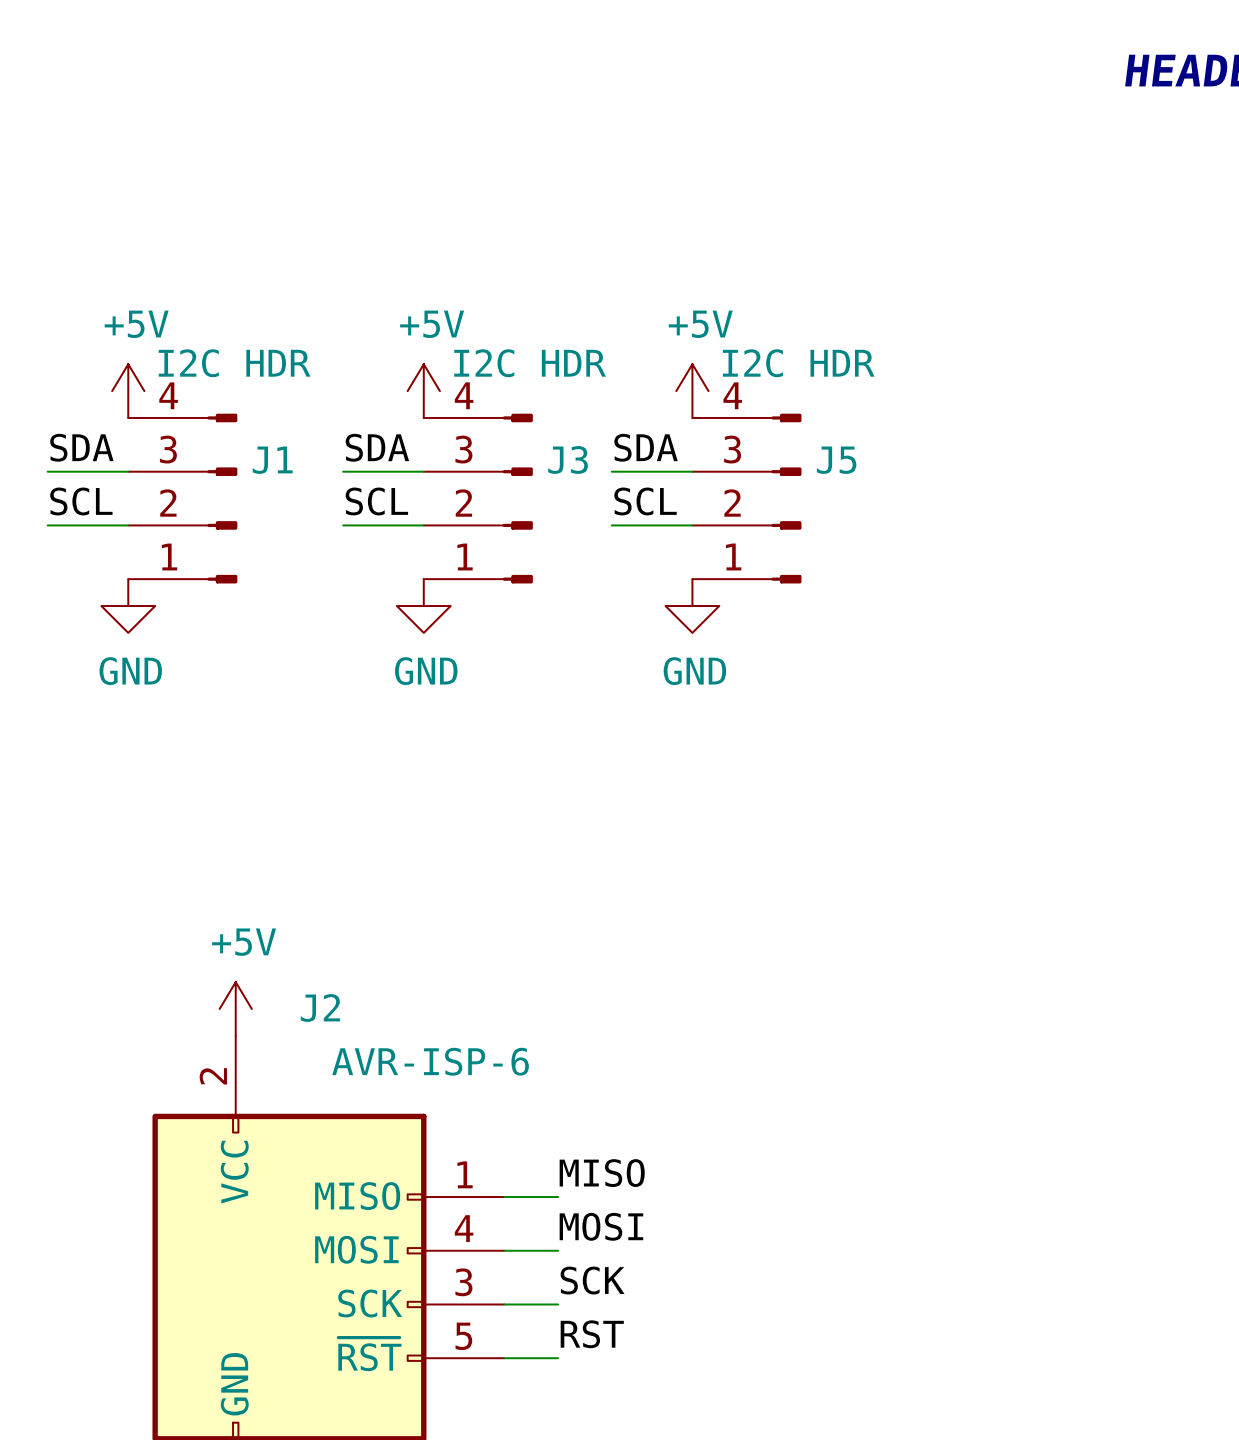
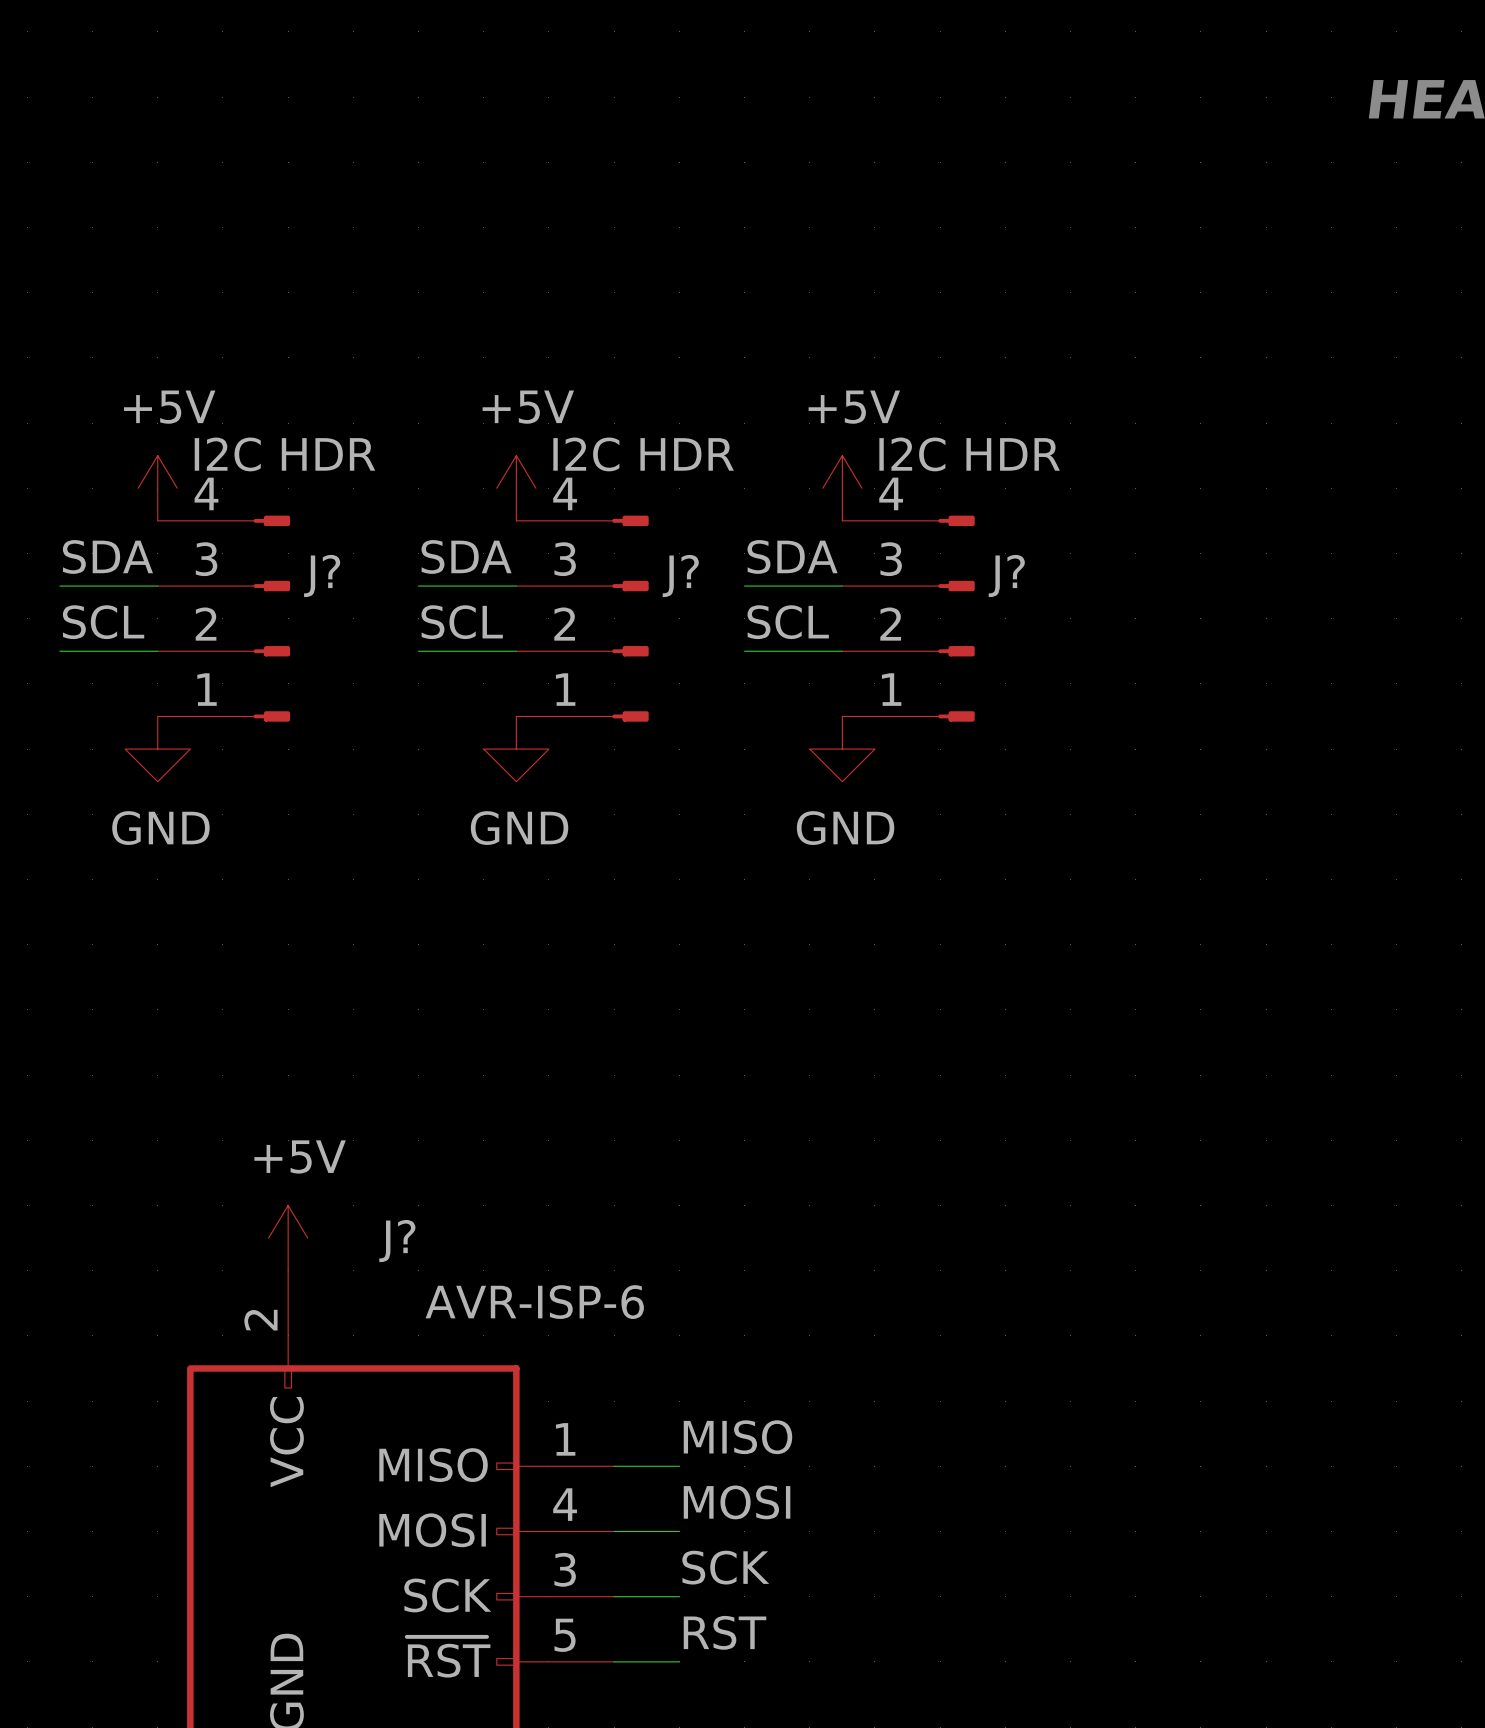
J3 name: J3 (568, 459) -> J? (680, 575)
J1 name: J1 (272, 460) -> J? (322, 575)
J5 name: J5 (836, 460) -> J? (1006, 575)
J2 name: J2 (320, 1008) -> J? (397, 1241)

